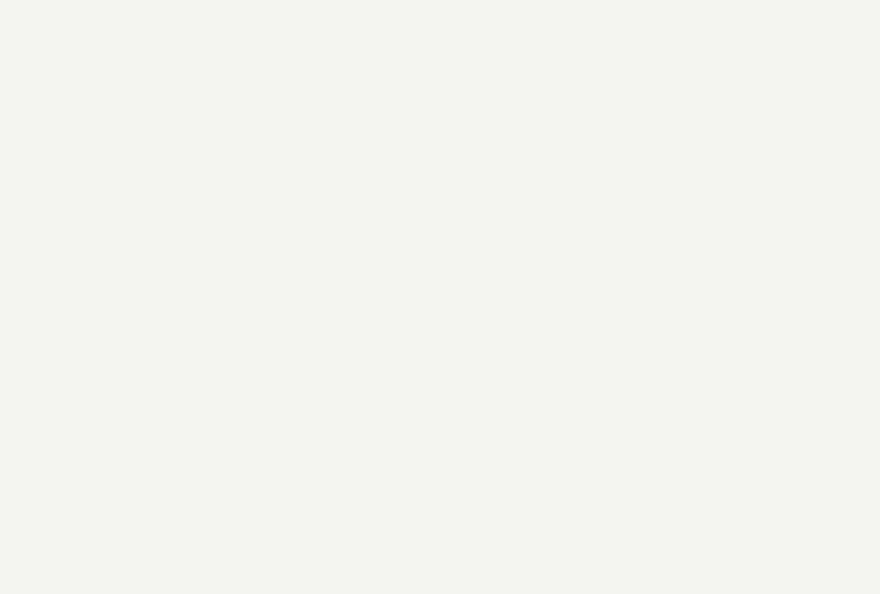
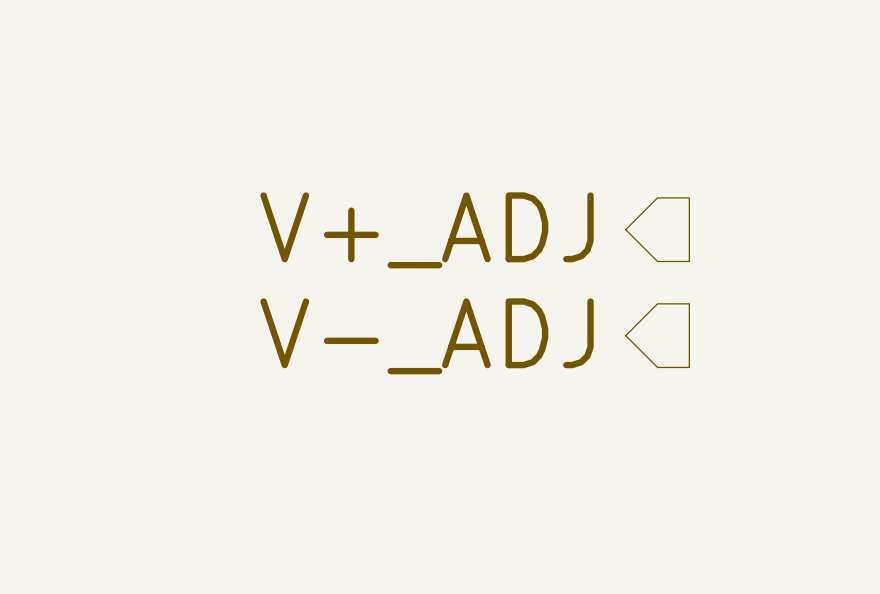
hierarchical label: none -> V+_ADJ (427, 230)
hierarchical label: none -> V-_ADJ (427, 336)

